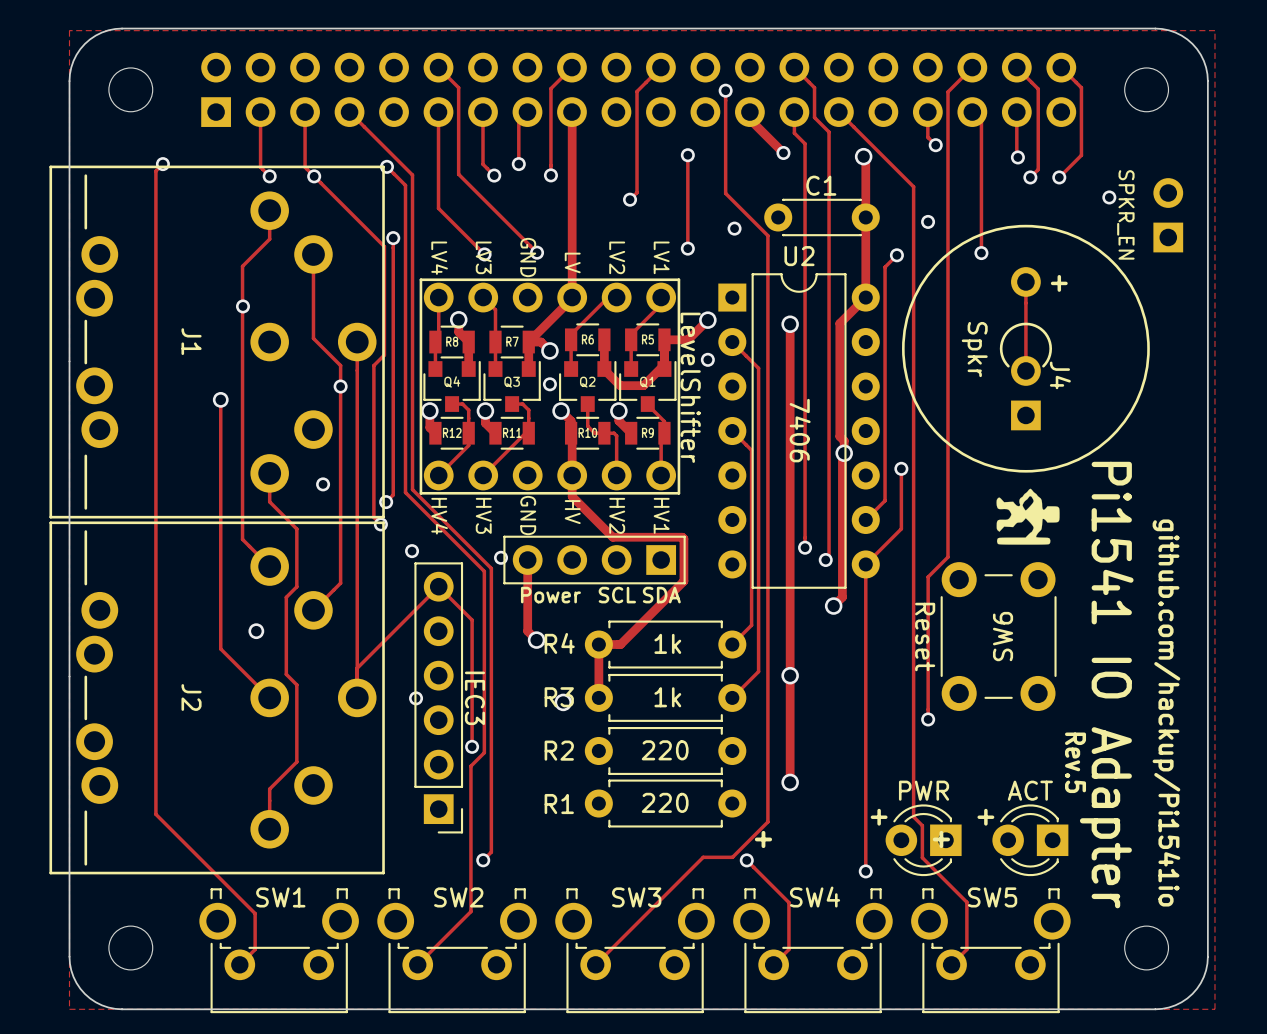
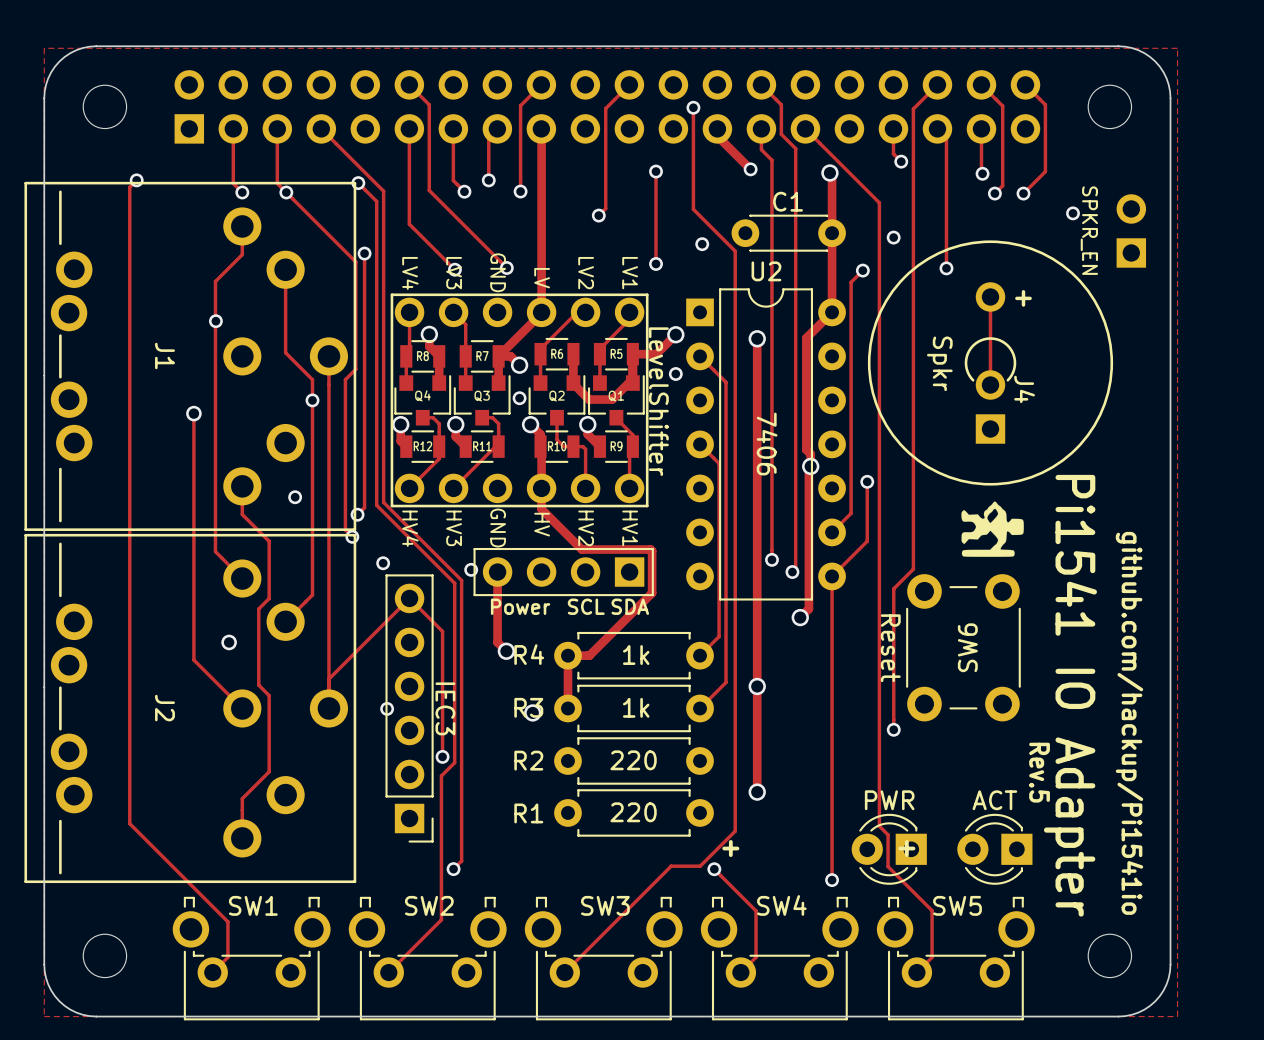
text: + (879, 817) -> none
text: + (985, 817) -> none

